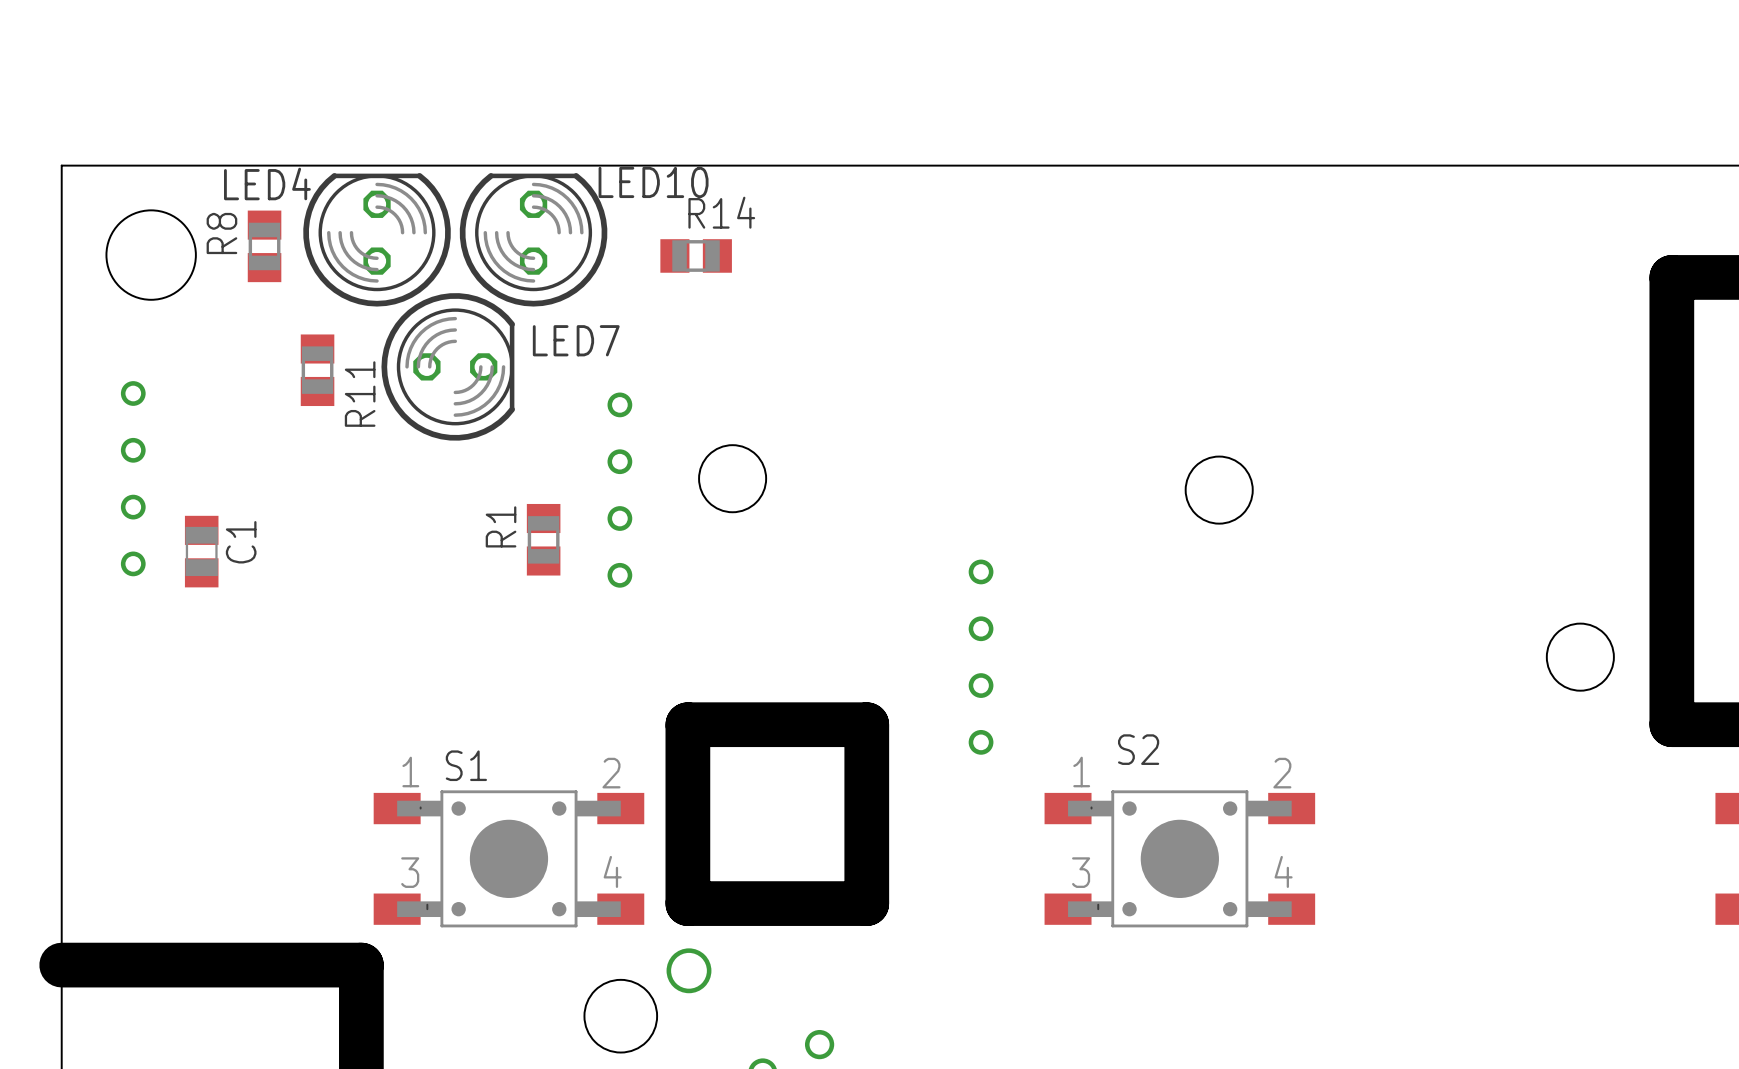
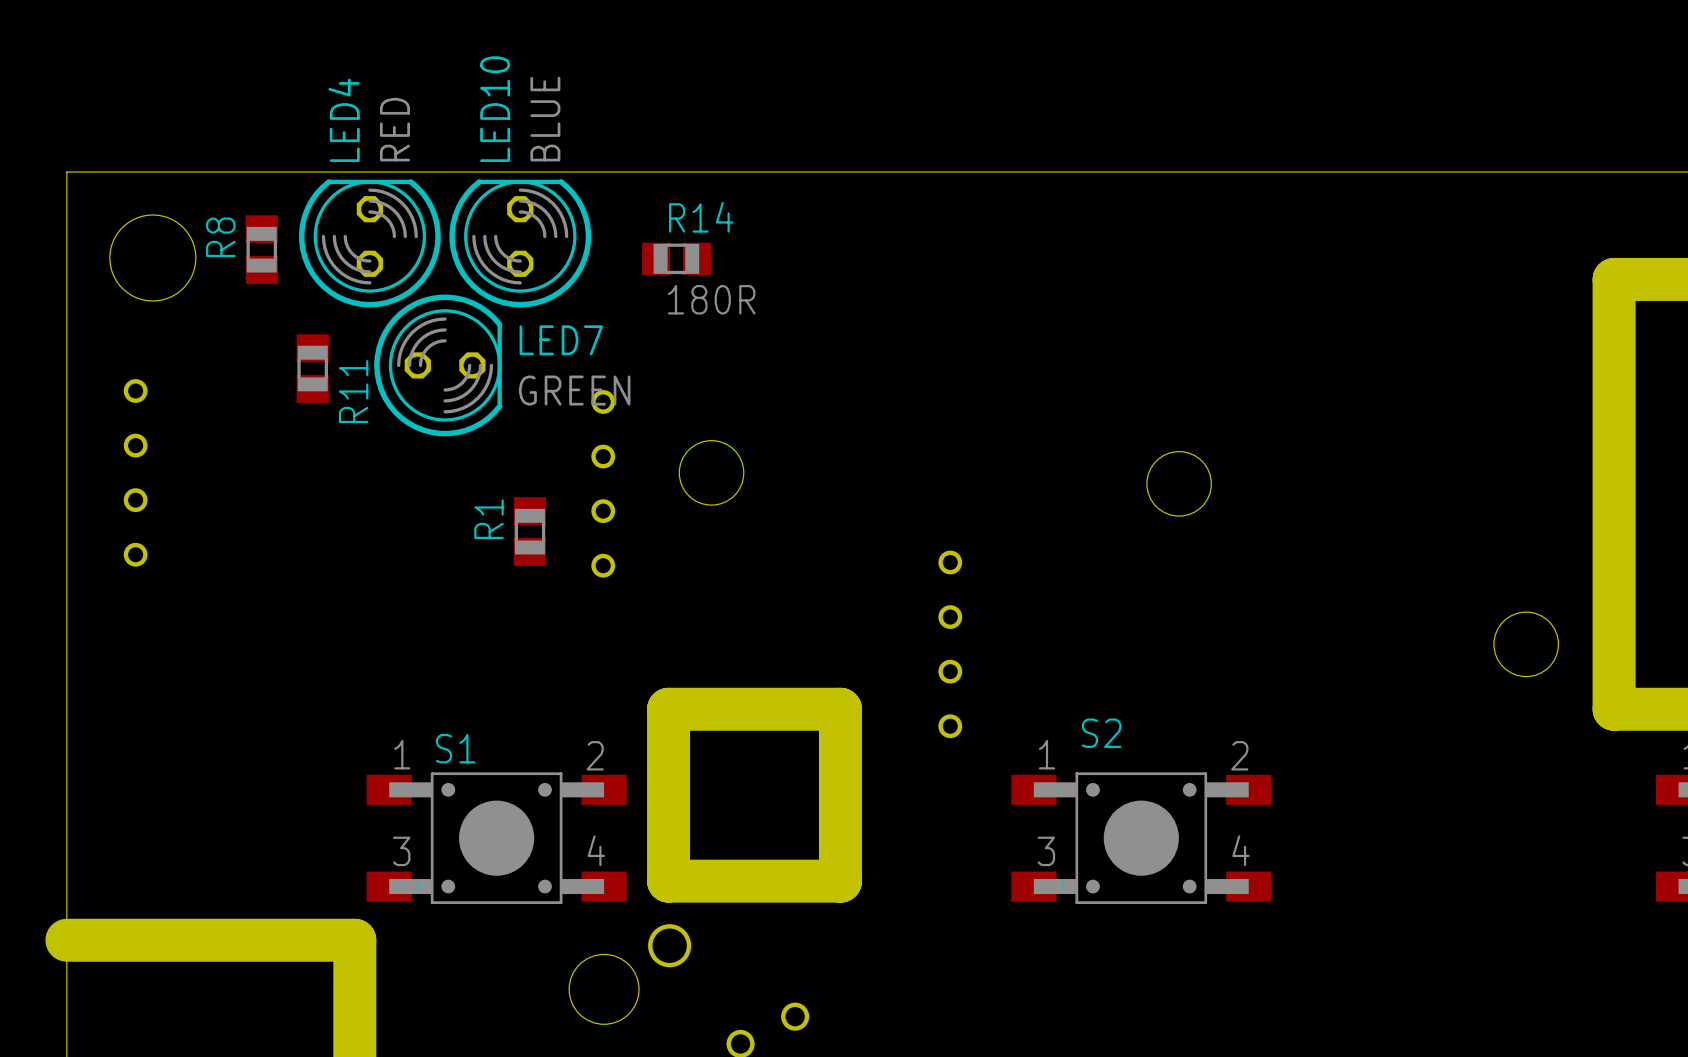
LED10 value: none -> BLUE (545, 119)
LED4 value: none -> RED (394, 129)
LED10 name rotation: 0° (653, 182) -> 90° counterclockwise (495, 109)
LED10 name position: LED10 (653, 182) -> LED10 (495, 109)
LED4 name rotation: 0° (267, 183) -> 90° counterclockwise (344, 120)
LED4 name position: LED4 (267, 183) -> LED4 (344, 120)
R14 value: none -> 180R (711, 299)
LED7 value: none -> GREEN (574, 390)
C1: (201, 551) -> none

